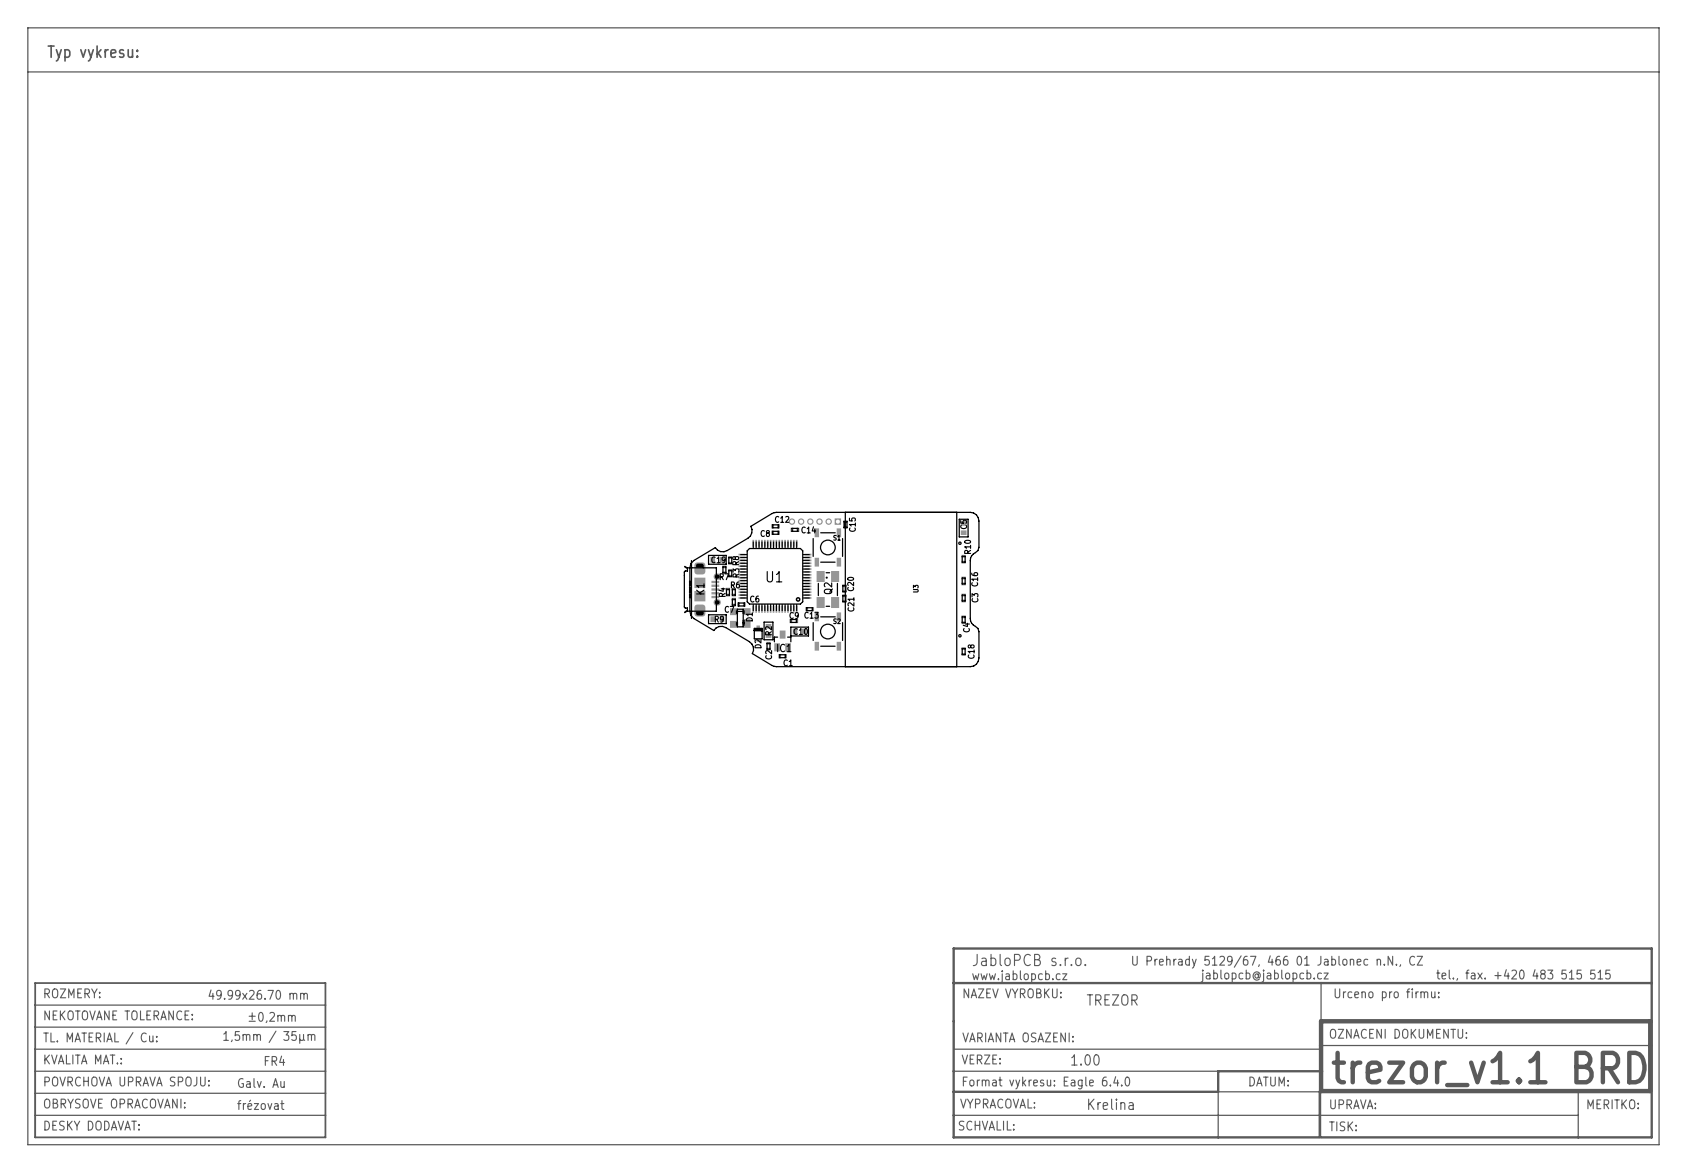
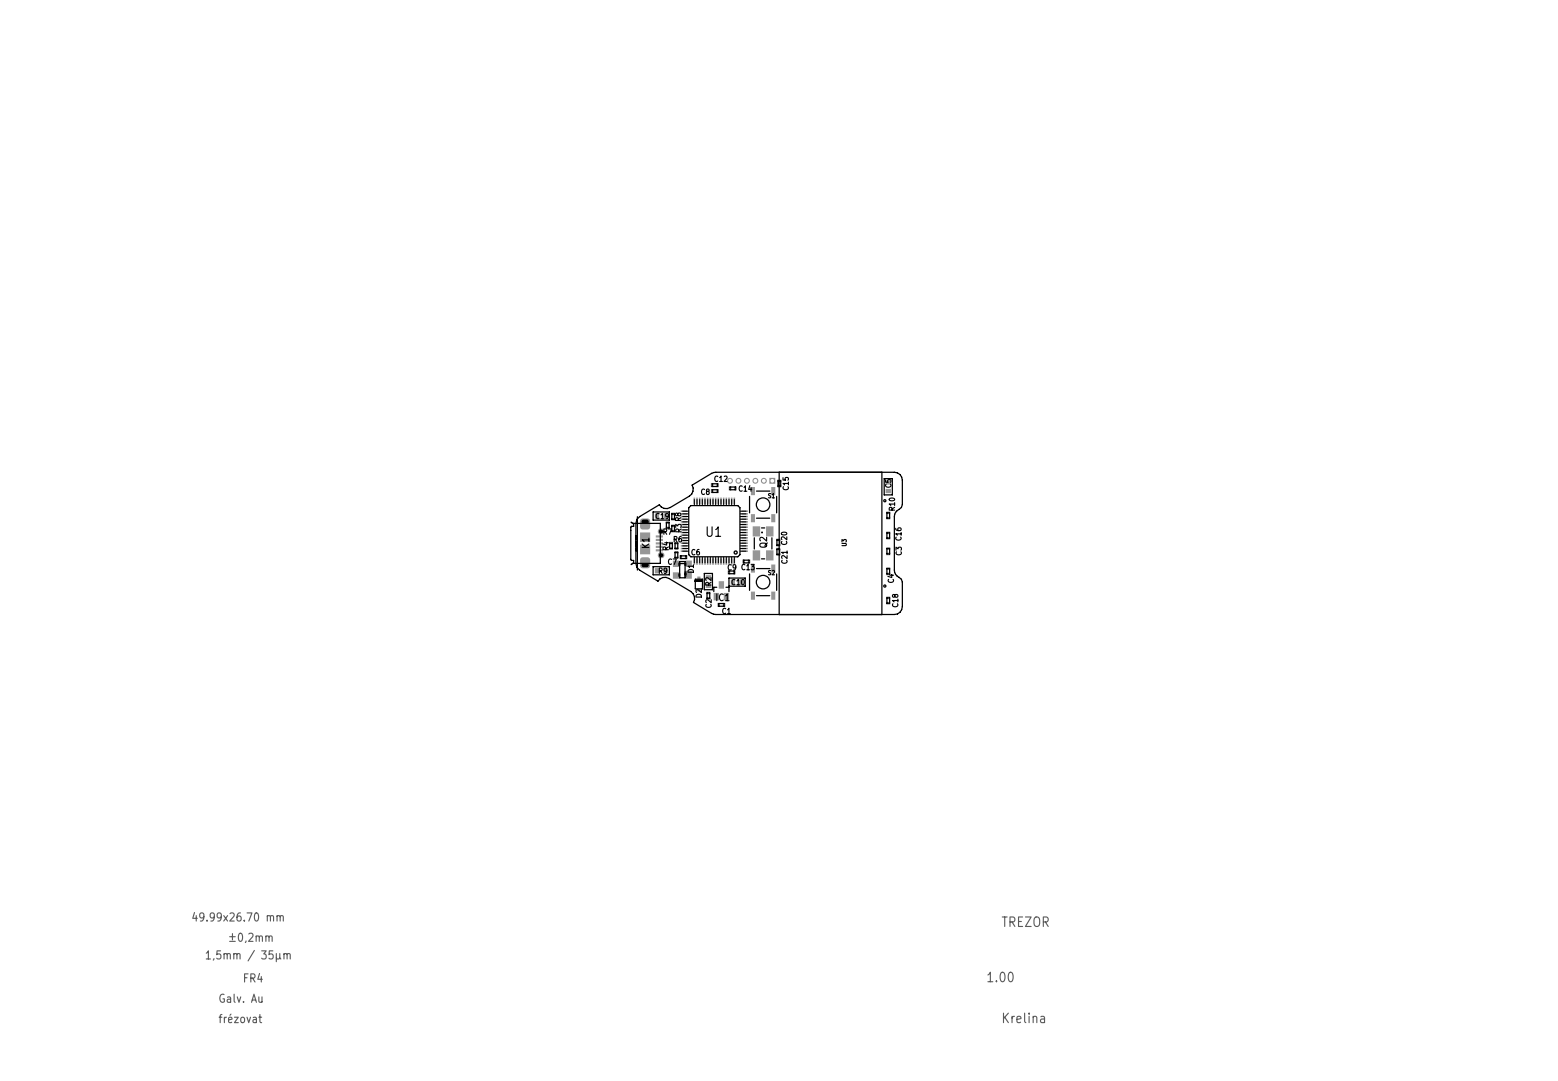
drawing: [27, 27, 1660, 1146] -> none

